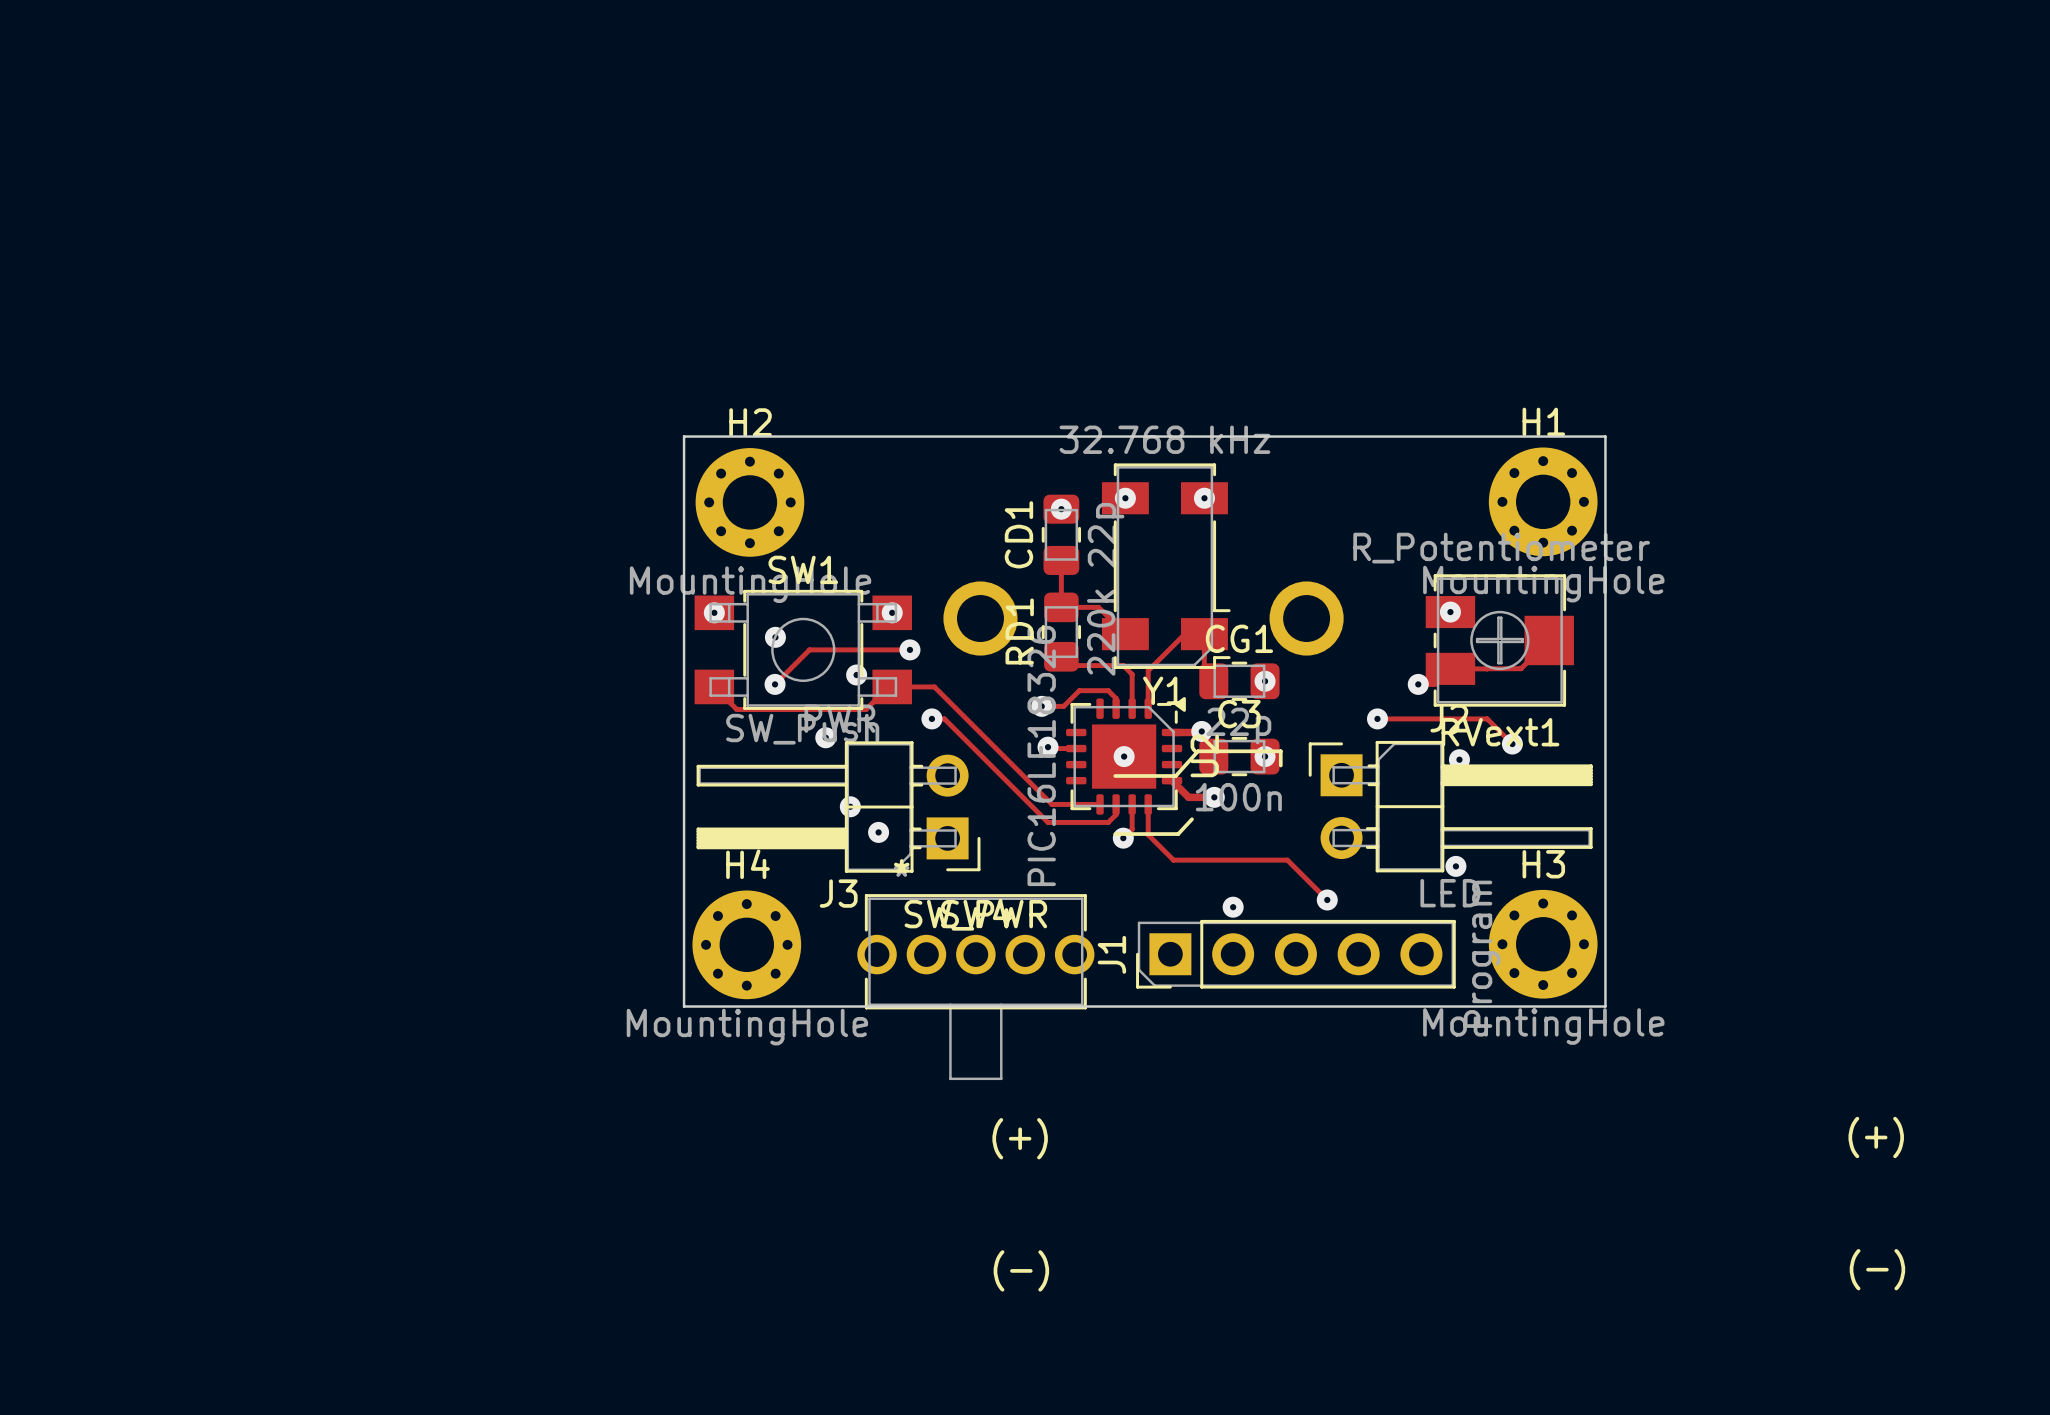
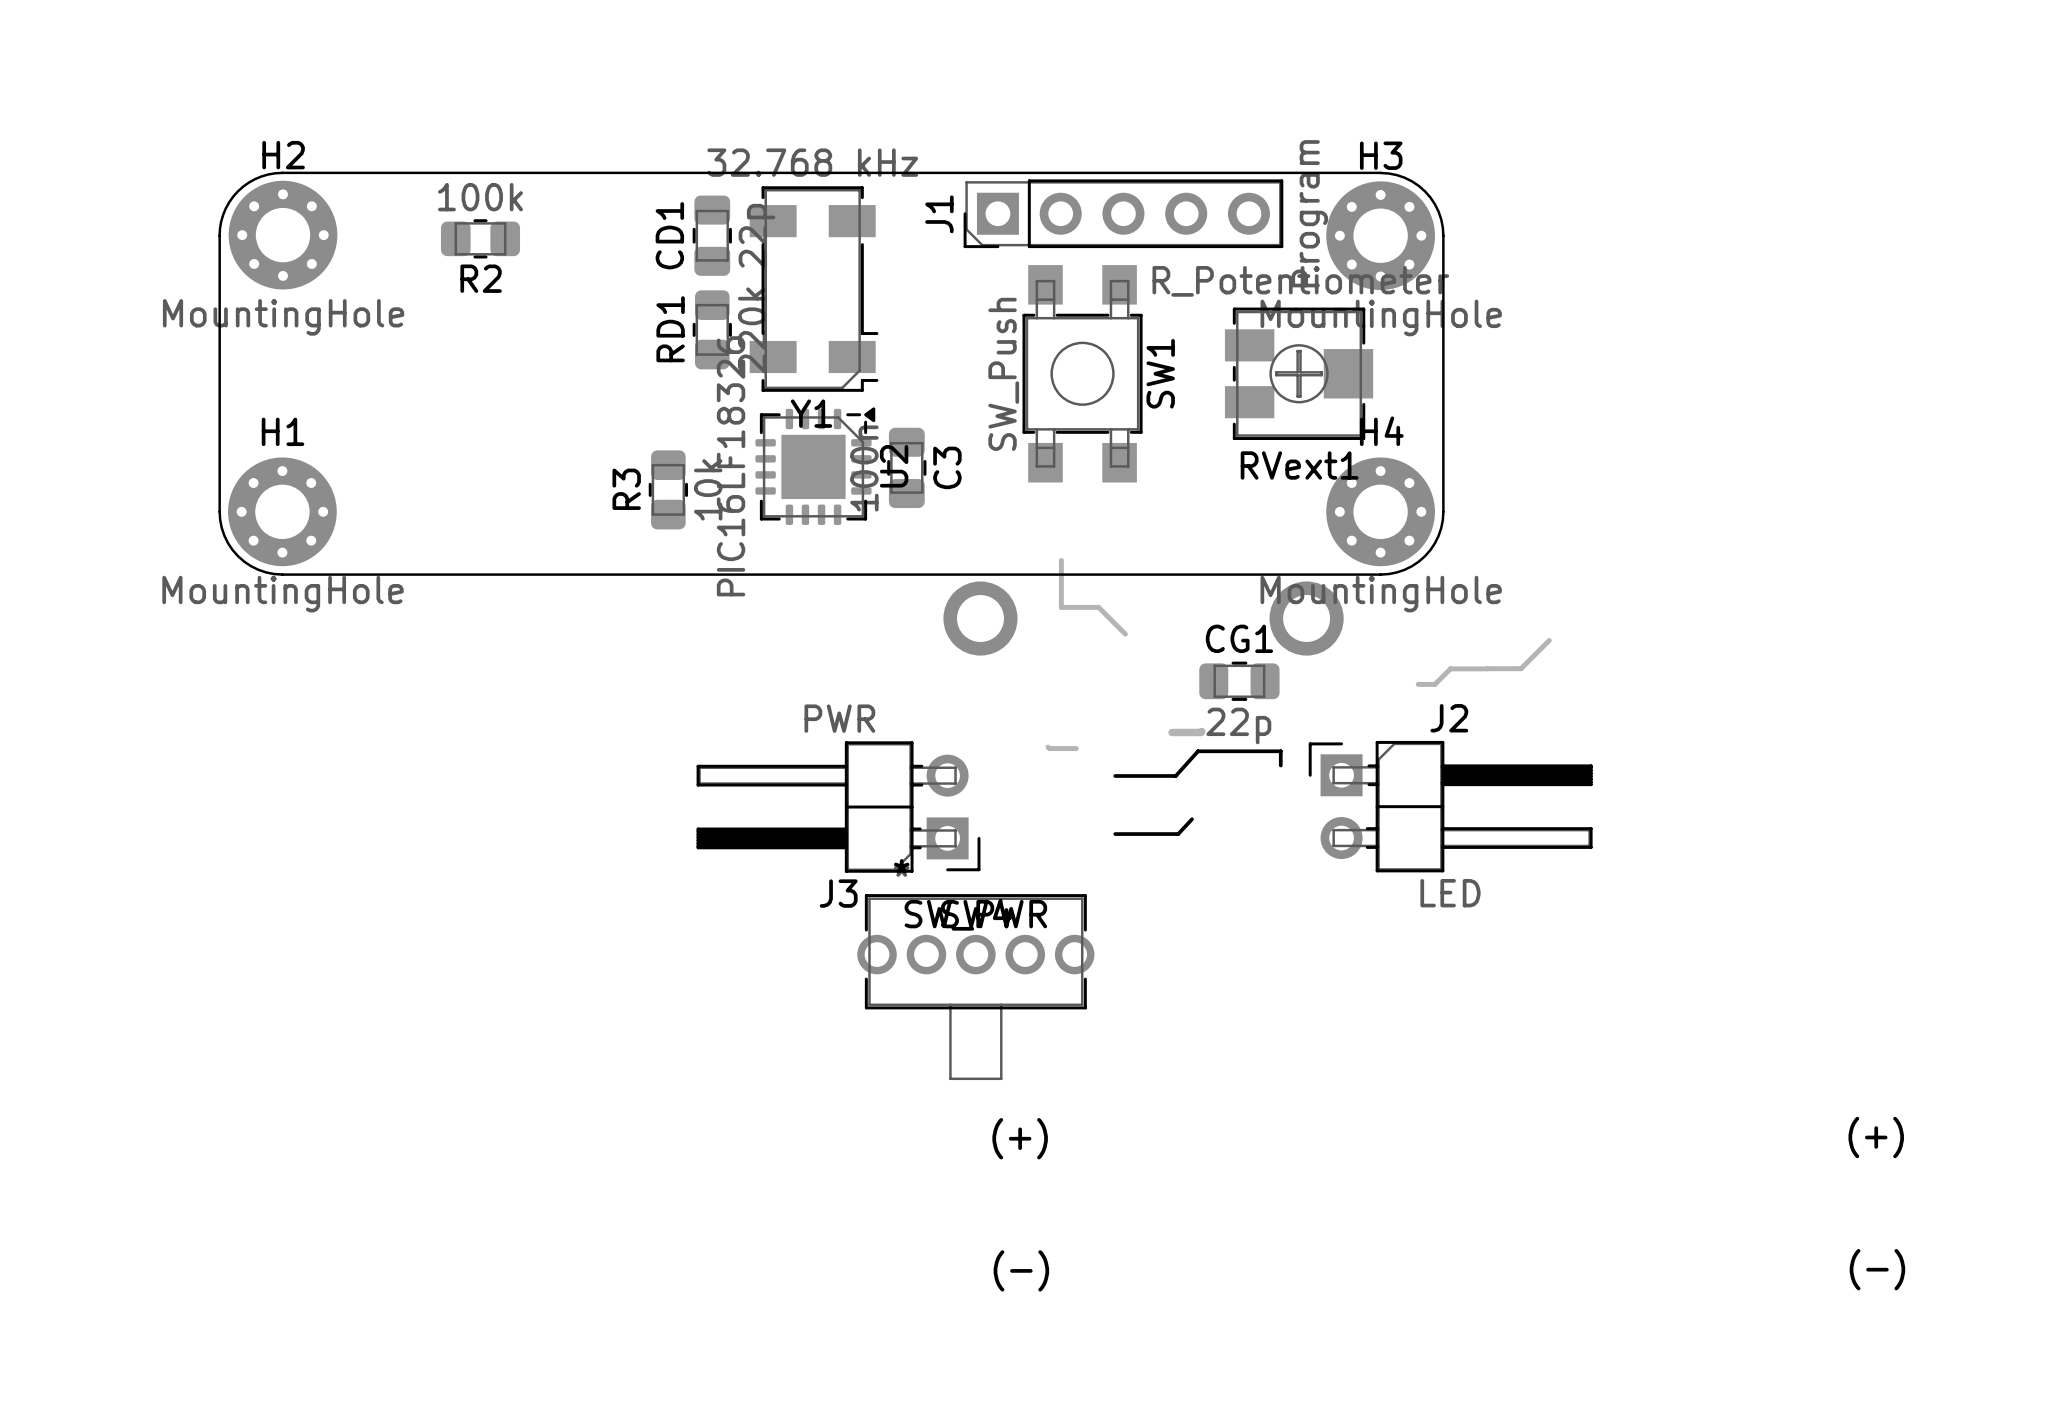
board edge: none -> (282, 172) (1380, 172) (1396, 175) (1412, 181) (1430, 197) (1438, 211) (1442, 227) (1443, 511) (1441, 528) (1430, 550) (1418, 561) (1404, 569) (1380, 574) (282, 574) (266, 572) (251, 566) (238, 556) (224, 535) (220, 520) (219, 235) (223, 214) (229, 202) (237, 191) (248, 182) (261, 176) (282, 172)
R2: none -> 100k (480, 238)
board edge: (684, 436) (1605, 436) (1605, 1006) (684, 1006) (684, 436) -> none
R3: none -> 10k (668, 489)
via: (1125, 498) -> none
via: (1204, 498) -> none
H1 position: (1543, 501) -> (282, 511)
H2 position: (749, 502) -> (283, 235)
via: (1061, 509) -> none
CD1 position: (1061, 534) -> (712, 235)
Y1 position: (1166, 566) -> (814, 289)
via: (714, 612) -> none
via: (892, 612) -> none
via: (1450, 612) -> none
RD1 position: (1061, 632) -> (712, 329)
via: (775, 637) -> none
RVext1 position: (1499, 640) -> (1299, 373)
SW1 rotation: 0° (803, 649) -> 90° clockwise (1082, 373)
SW1 position: (803, 649) -> (1082, 373)
track: (909, 649) (809, 649) (775, 684) -> none
via: (909, 649) -> none
track: (1061, 656) (1070, 665) (1123, 665) (1132, 674) (1132, 708) -> none
via: (856, 674) -> none
track: (1204, 681) (1204, 634) (1184, 634) (1148, 670) (1148, 708) -> none
via: (1265, 681) -> none
via: (775, 684) -> none
via: (1418, 684) -> none
track: (714, 686) (736, 709) (866, 709) (888, 686) (934, 686) (1051, 804) (1100, 804) -> none
track: (1041, 706) (1063, 706) (1079, 690) (1108, 690) (1116, 698) (1116, 708) -> none
via: (1041, 706) -> none
track: (931, 718) (944, 718) (1048, 822) (1108, 822) (1116, 814) (1116, 804) -> none
via: (931, 718) -> none
track: (1377, 718) (1487, 718) (1512, 744) -> none
via: (1377, 718) -> none
via: (1201, 731) -> none
via: (825, 737) -> none
via: (1512, 744) -> none
via: (1048, 747) -> none
U2 position: (1125, 755) -> (815, 466)
via: (1124, 756) -> none
C3 rotation: 0° (1239, 756) -> 90° clockwise (906, 467)
C3 position: (1239, 756) -> (906, 467)
via: (1265, 756) -> none
via: (1459, 759) -> none
track: (1172, 780) (1188, 797) (1214, 797) -> none
via: (1214, 797) -> none
track: (1132, 804) (1132, 829) (1123, 838) -> none
track: (1148, 804) (1148, 834) (1173, 860) (1287, 860) (1327, 899) -> none
via: (850, 806) -> none
via: (878, 832) -> none
via: (1123, 838) -> none
via: (1455, 866) -> none
via: (1327, 899) -> none
via: (1233, 907) -> none
H4 position: (746, 944) -> (1380, 511)
H3 position: (1543, 944) -> (1380, 235)
J1 position: (1295, 954) -> (1123, 213)

